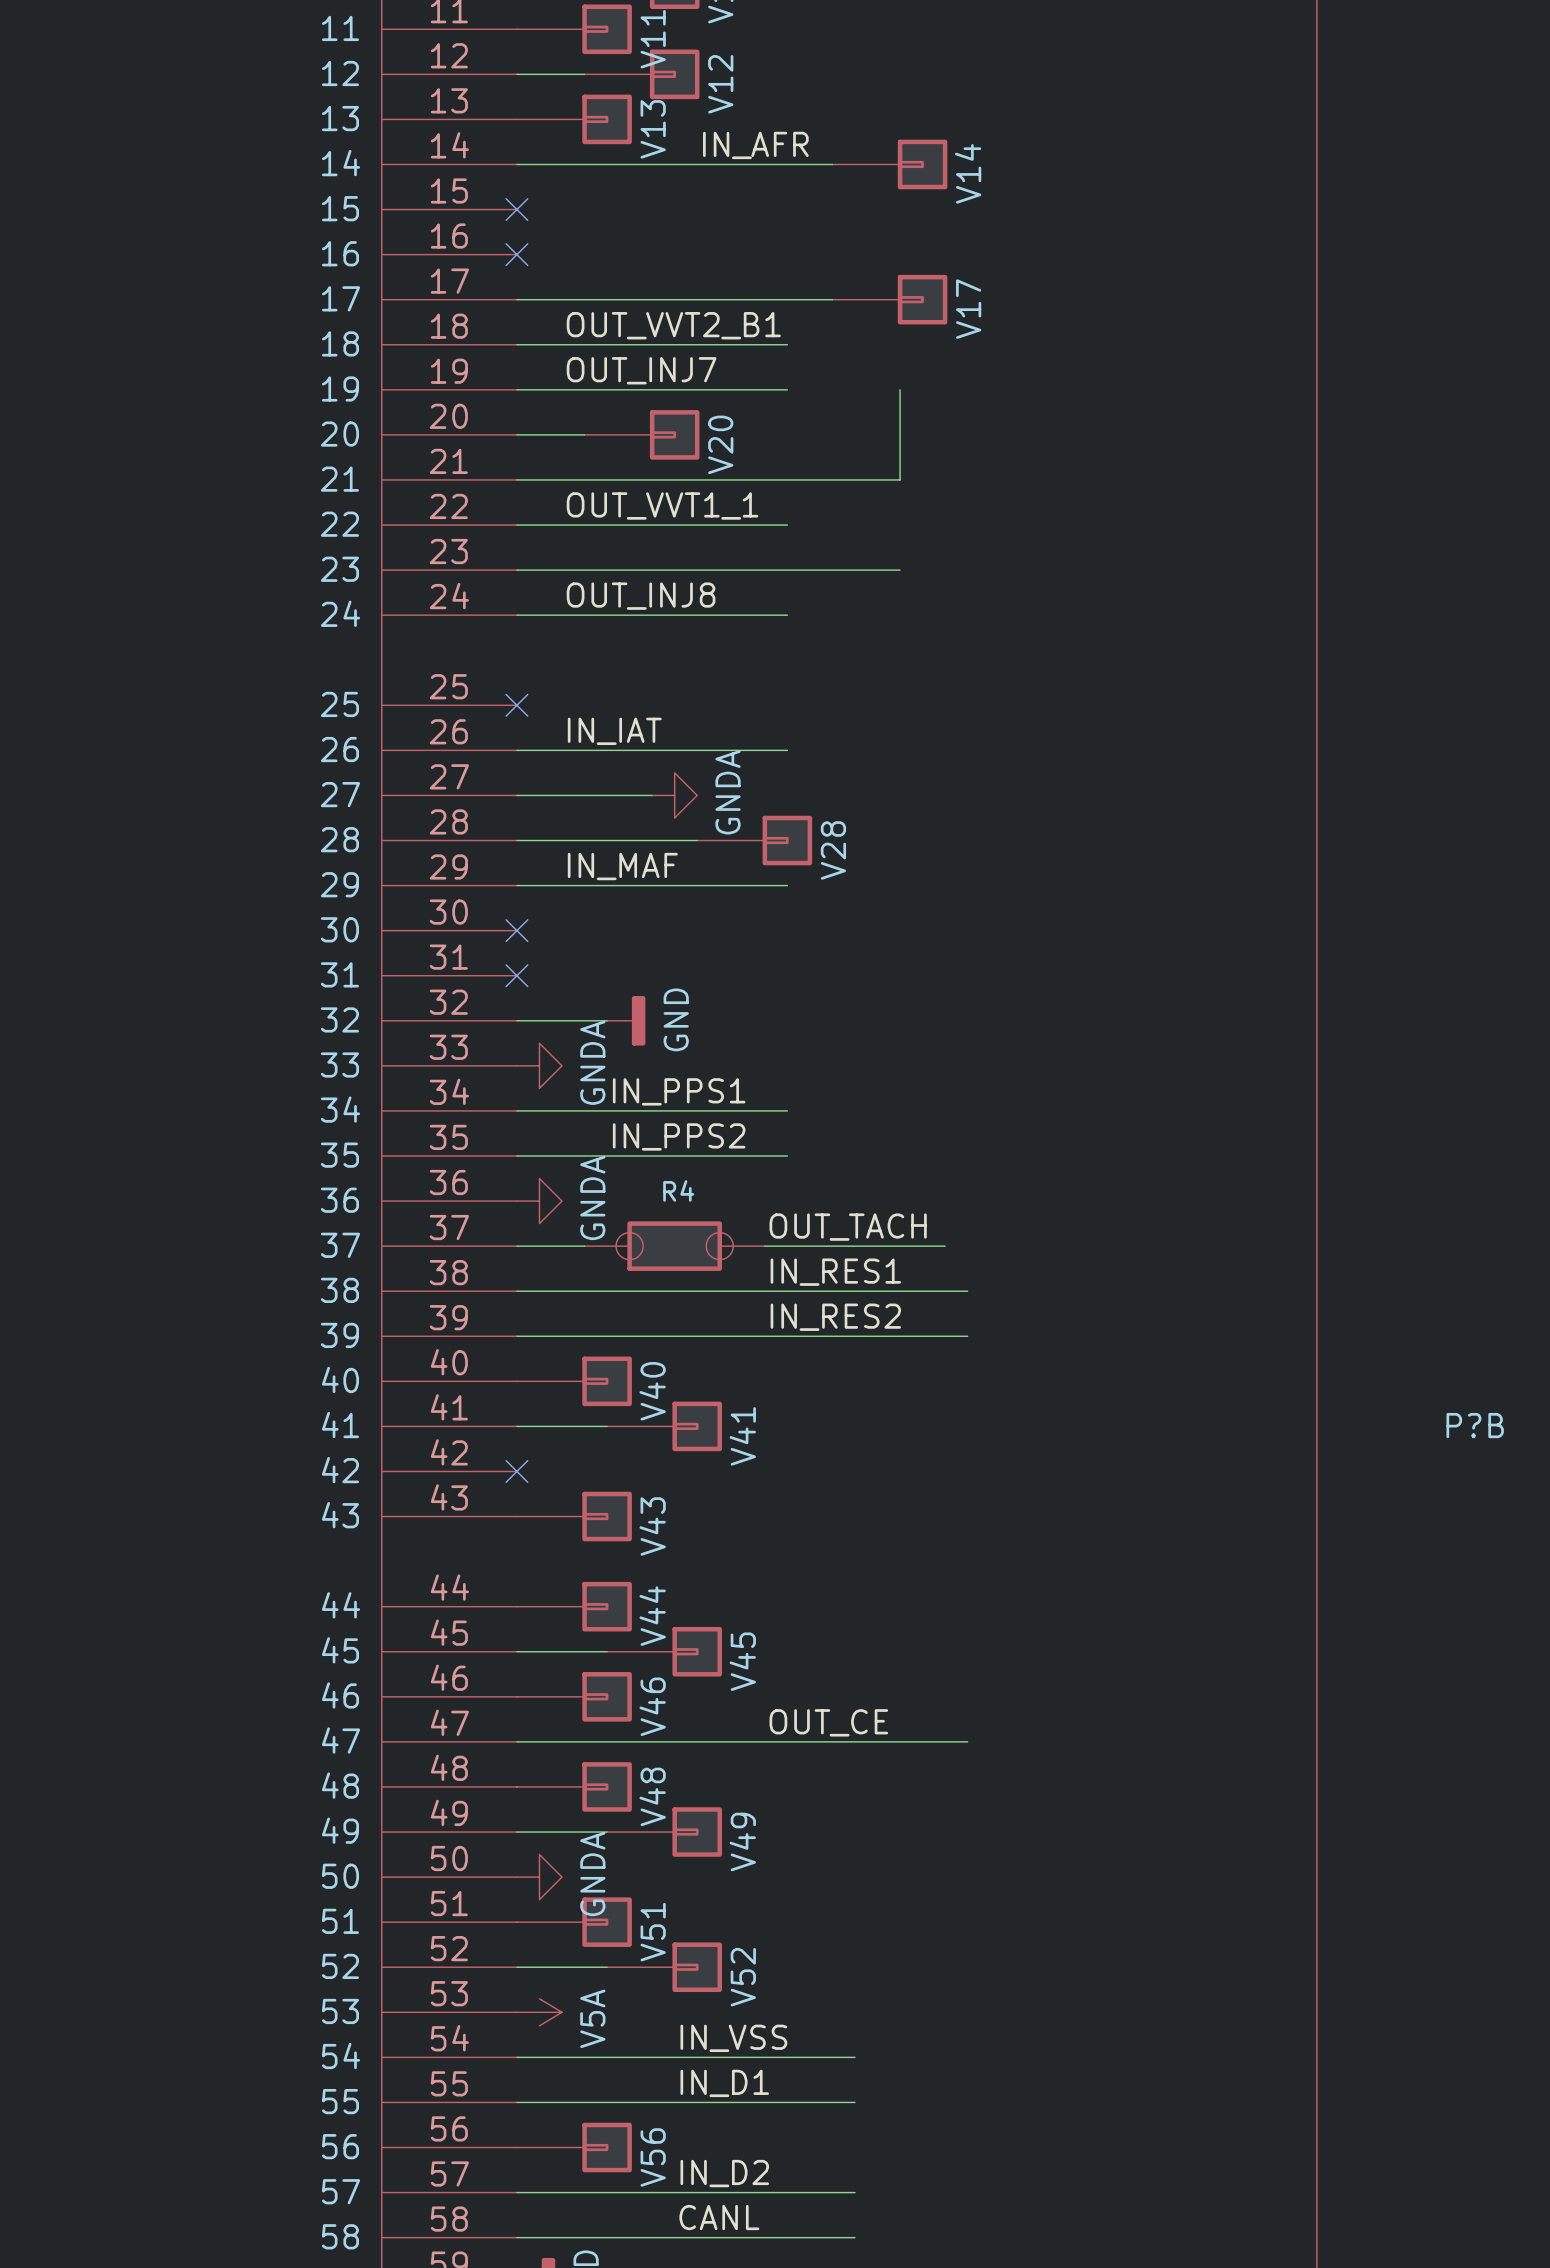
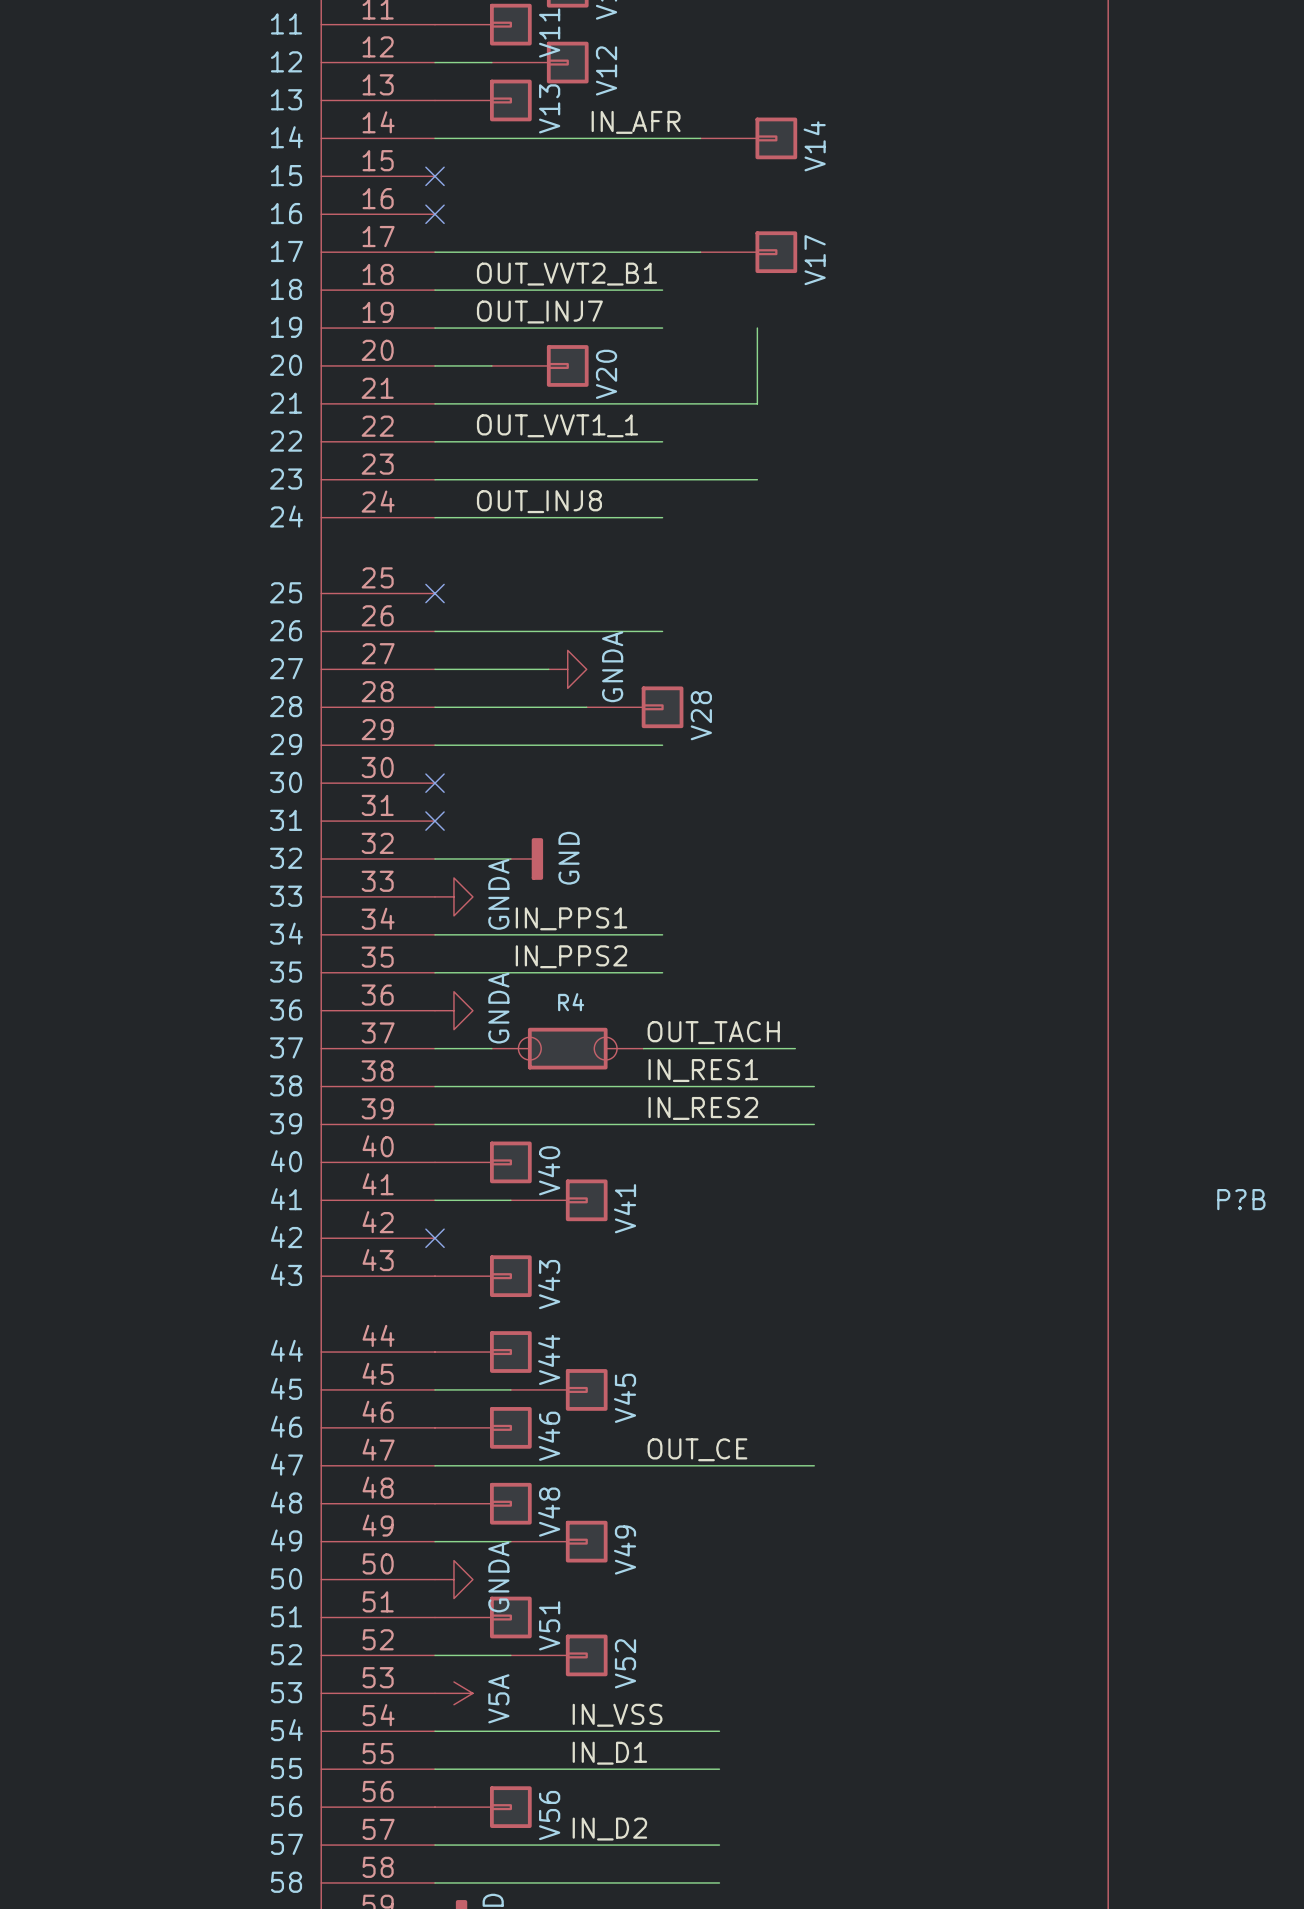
label: IN_IAT (614, 731) -> none
label: IN_MAF (622, 866) -> none
label: CANL (719, 2217) -> none

